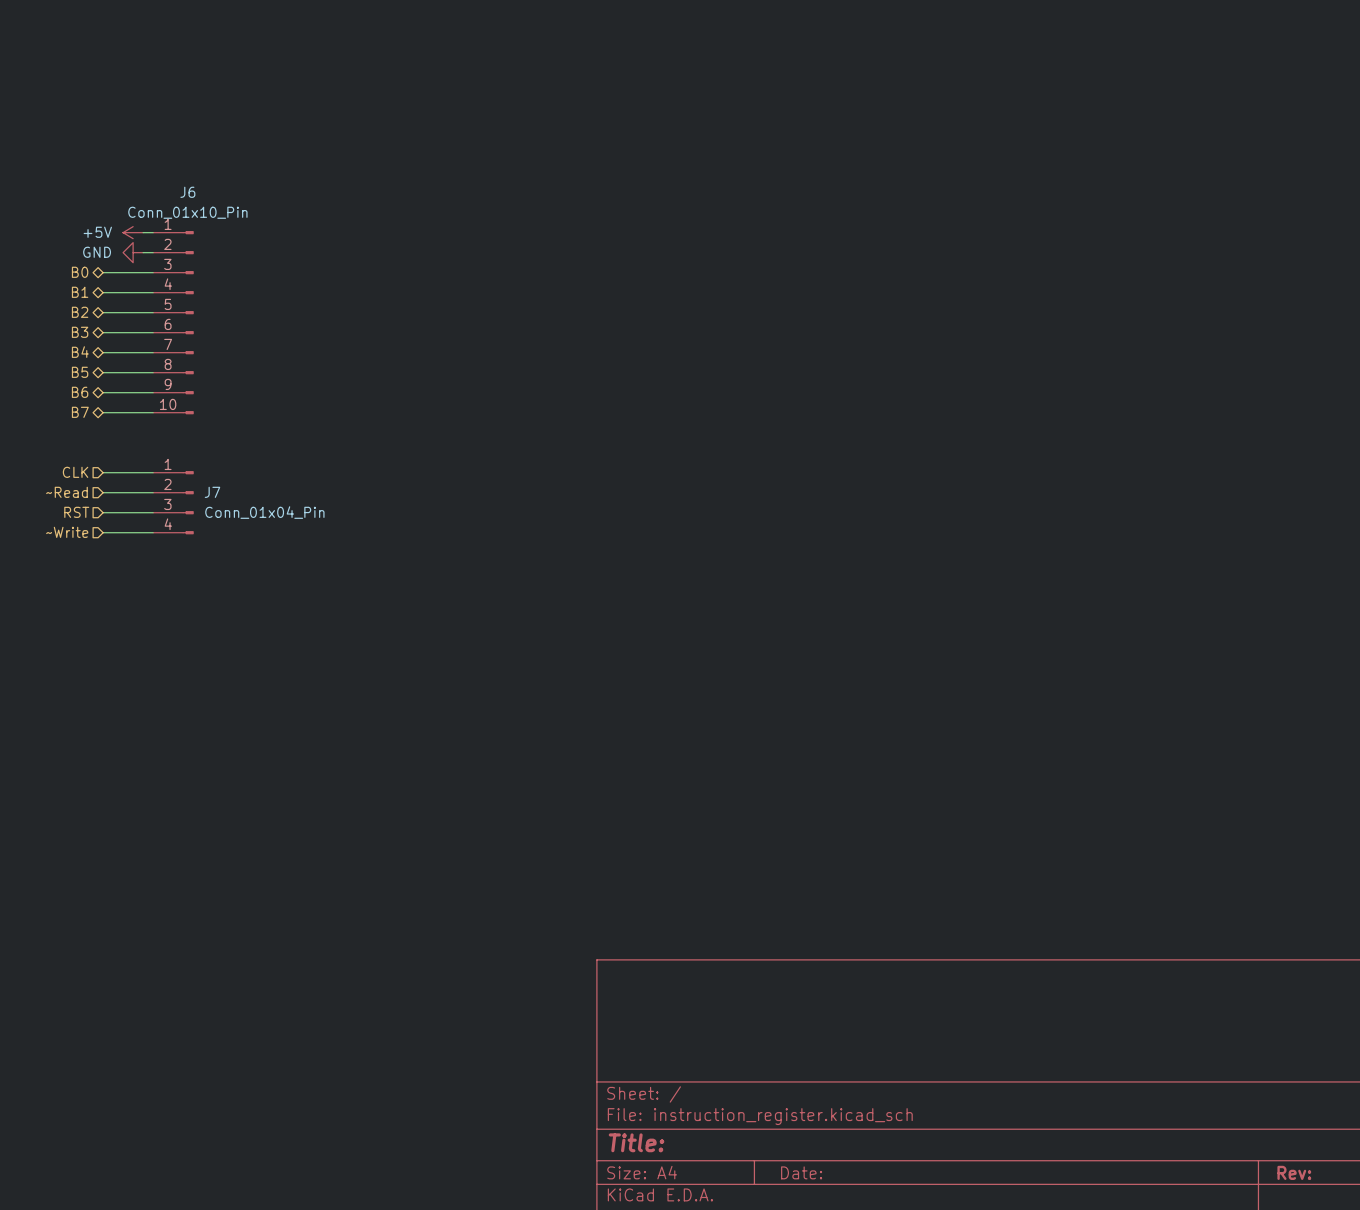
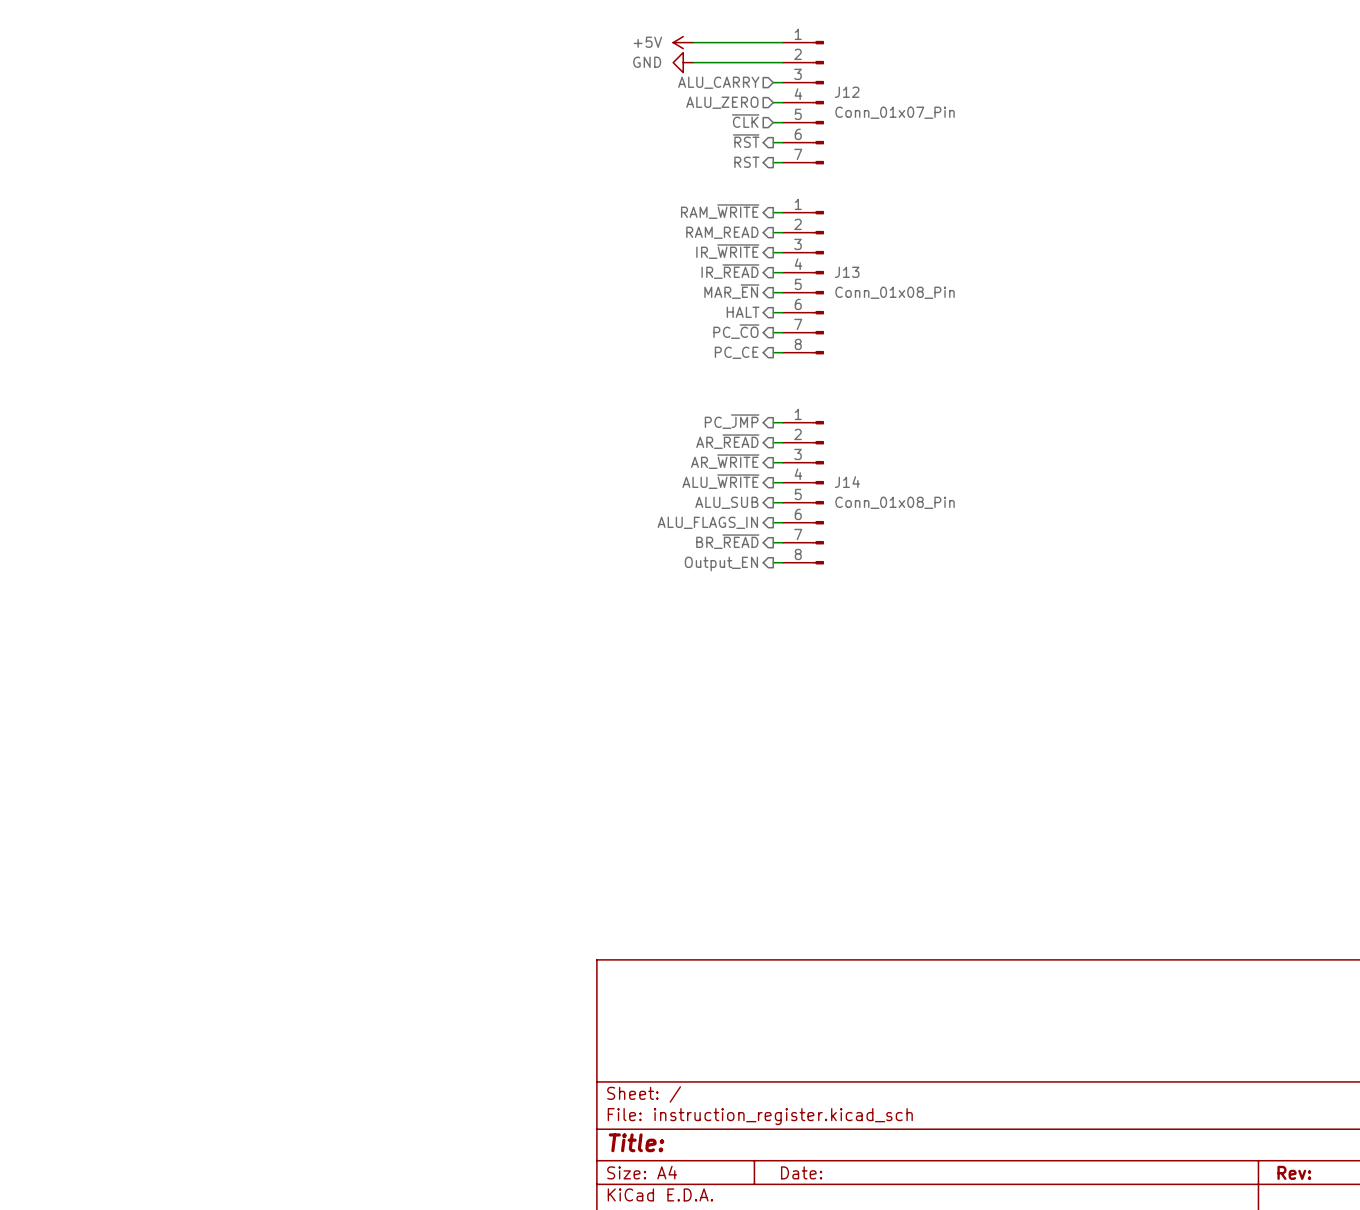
power symbol: none -> +5V (683, 42)
wire: none -> (693, 42) (783, 42)
power symbol: none -> GND (683, 62)
wire: none -> (693, 62) (783, 62)
hierarchical label: none -> ALU_CARRY (718, 82)
wire: none -> (773, 82) (783, 82)
hierarchical label: none -> ALU_ZERO (722, 102)
wire: none -> (773, 102) (783, 102)
J12: none -> Conn_01x07_Pin (803, 102)
hierarchical label: none -> ~{CLK} (745, 121)
wire: none -> (773, 122) (783, 122)
hierarchical label: none -> ~{RST} (746, 141)
wire: none -> (773, 142) (783, 142)
hierarchical label: none -> RST (746, 162)
wire: none -> (773, 162) (783, 162)
hierarchical label: none -> RAM_~{WRITE} (720, 211)
wire: none -> (773, 212) (783, 212)
power symbol: +5V (133, 232) -> none
wire: (143, 232) (153, 232) -> none
hierarchical label: none -> RAM_READ (722, 232)
wire: none -> (773, 232) (783, 232)
hierarchical label: none -> IR_~{WRITE} (727, 251)
power symbol: GND (133, 252) -> none
wire: (143, 252) (153, 252) -> none
wire: none -> (773, 252) (783, 252)
hierarchical label: none -> IR_~{READ} (730, 271)
hierarchical label: B0 (80, 272) -> none
wire: (103, 272) (153, 272) -> none
wire: none -> (773, 272) (783, 272)
J13: none -> Conn_01x08_Pin (803, 282)
hierarchical label: none -> MAR_~{EN} (731, 291)
hierarchical label: B1 (80, 292) -> none
wire: (103, 292) (153, 292) -> none
wire: none -> (773, 292) (783, 292)
hierarchical label: B2 (80, 312) -> none
wire: (103, 312) (153, 312) -> none
hierarchical label: none -> HALT (743, 312)
wire: none -> (773, 312) (783, 312)
J6: Conn_01x10_Pin (173, 322) -> none
hierarchical label: none -> PC_~{CO} (736, 331)
hierarchical label: B3 (80, 332) -> none
wire: (103, 332) (153, 332) -> none
wire: none -> (773, 332) (783, 332)
hierarchical label: B4 (80, 352) -> none
wire: (103, 352) (153, 352) -> none
hierarchical label: none -> PC_CE (736, 352)
wire: none -> (773, 352) (783, 352)
hierarchical label: B5 (80, 372) -> none
wire: (103, 372) (153, 372) -> none
hierarchical label: B6 (80, 392) -> none
wire: (103, 392) (153, 392) -> none
hierarchical label: B7 (80, 412) -> none
wire: (103, 412) (153, 412) -> none
hierarchical label: none -> PC_~{JMP} (732, 421)
wire: none -> (773, 422) (783, 422)
hierarchical label: none -> AR_~{READ} (727, 441)
wire: none -> (773, 442) (783, 442)
hierarchical label: none -> AR_~{WRITE} (725, 461)
wire: none -> (773, 462) (783, 462)
hierarchical label: CLK (75, 472) -> none
wire: (103, 472) (153, 472) -> none
hierarchical label: none -> ALU_~{WRITE} (720, 481)
wire: none -> (773, 482) (783, 482)
hierarchical label: ~Read (66, 492) -> none
wire: (103, 492) (153, 492) -> none
J14: none -> Conn_01x08_Pin (803, 492)
J7: Conn_01x04_Pin (173, 502) -> none
hierarchical label: none -> ALU_SUB (726, 502)
wire: none -> (773, 502) (783, 502)
hierarchical label: RST (76, 512) -> none
wire: (103, 512) (153, 512) -> none
hierarchical label: none -> ALU_FLAGS_IN (707, 522)
wire: none -> (773, 522) (783, 522)
hierarchical label: ~Write (67, 532) -> none
wire: (103, 532) (153, 532) -> none
hierarchical label: none -> BR_~{READ} (727, 541)
wire: none -> (773, 542) (783, 542)
wire: none -> (773, 562) (783, 562)
hierarchical label: none -> Output_EN (721, 564)

